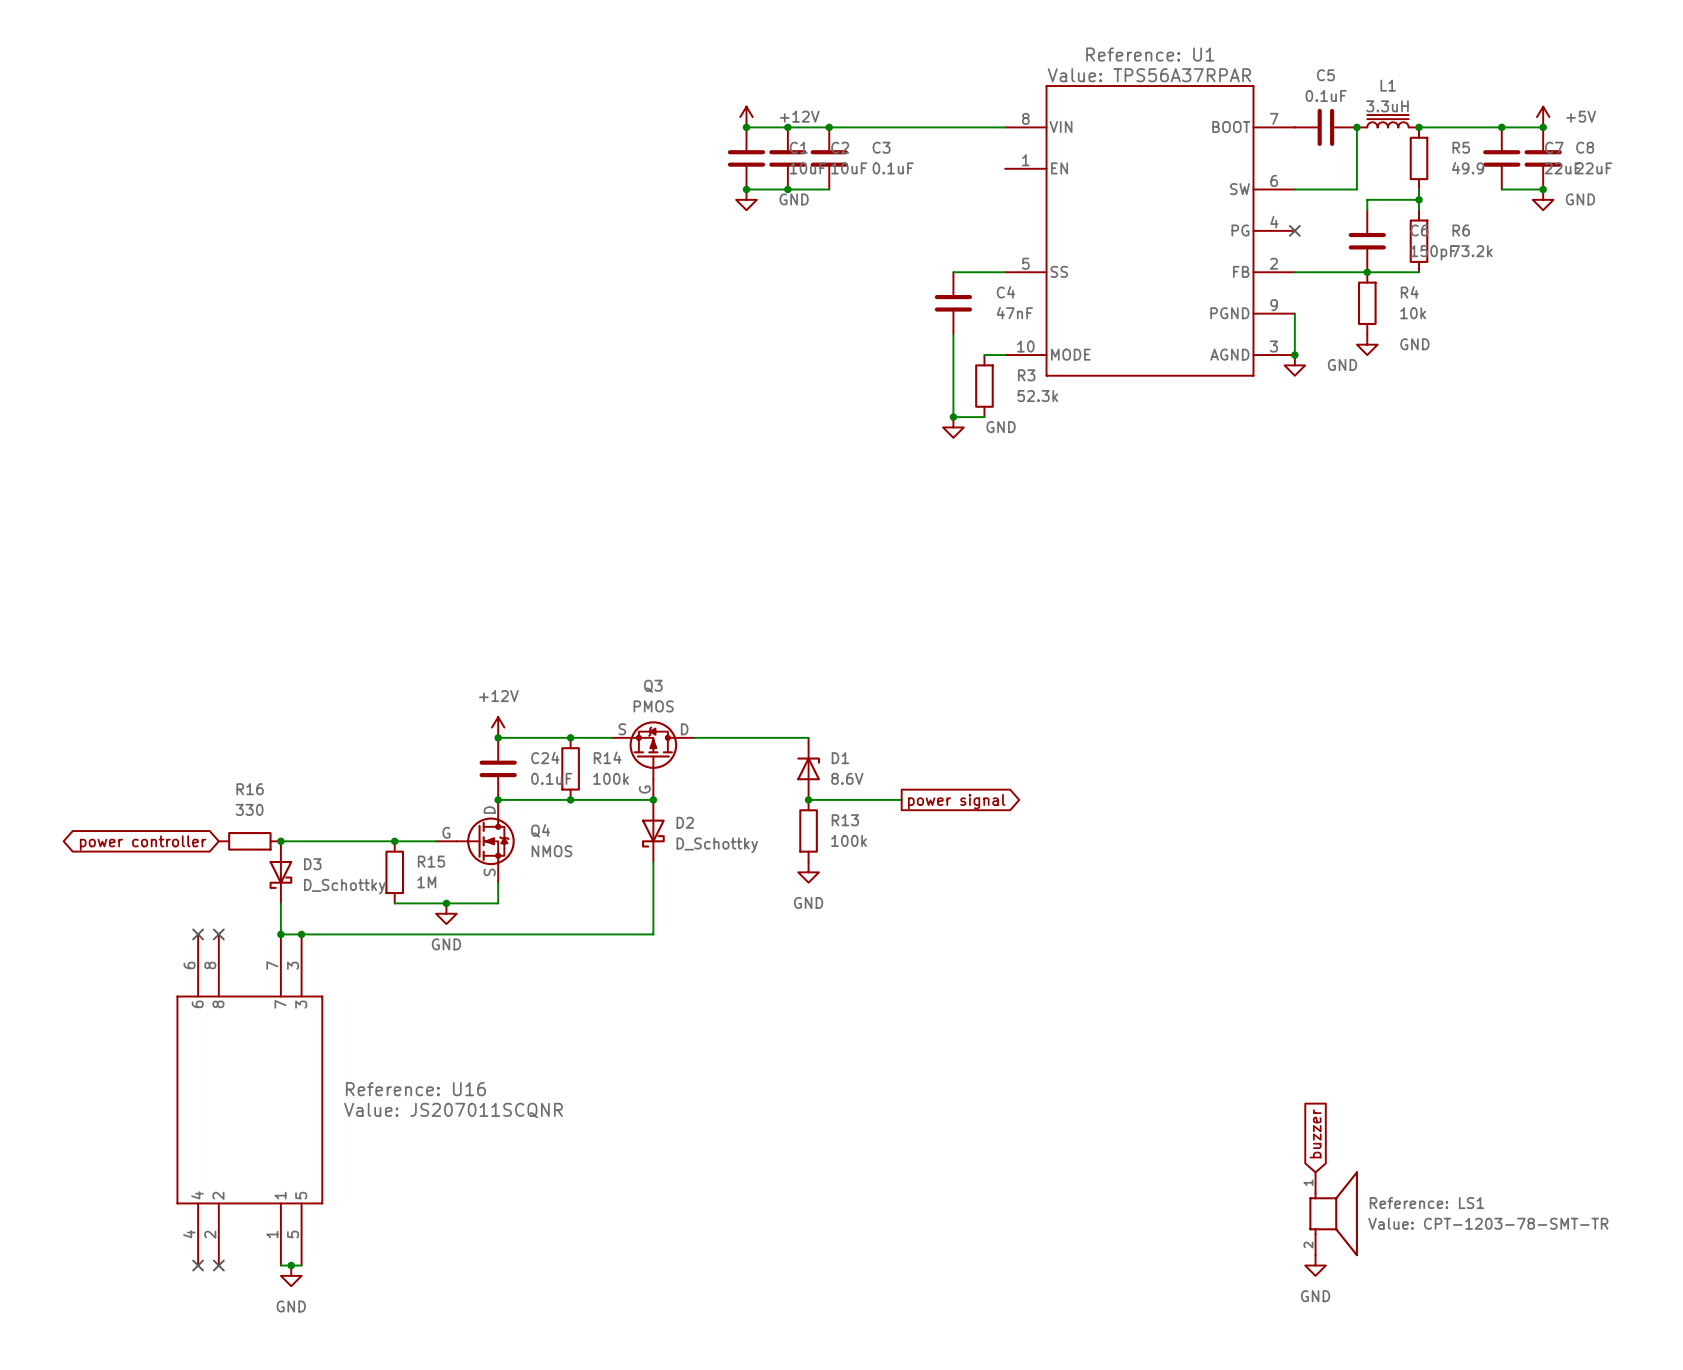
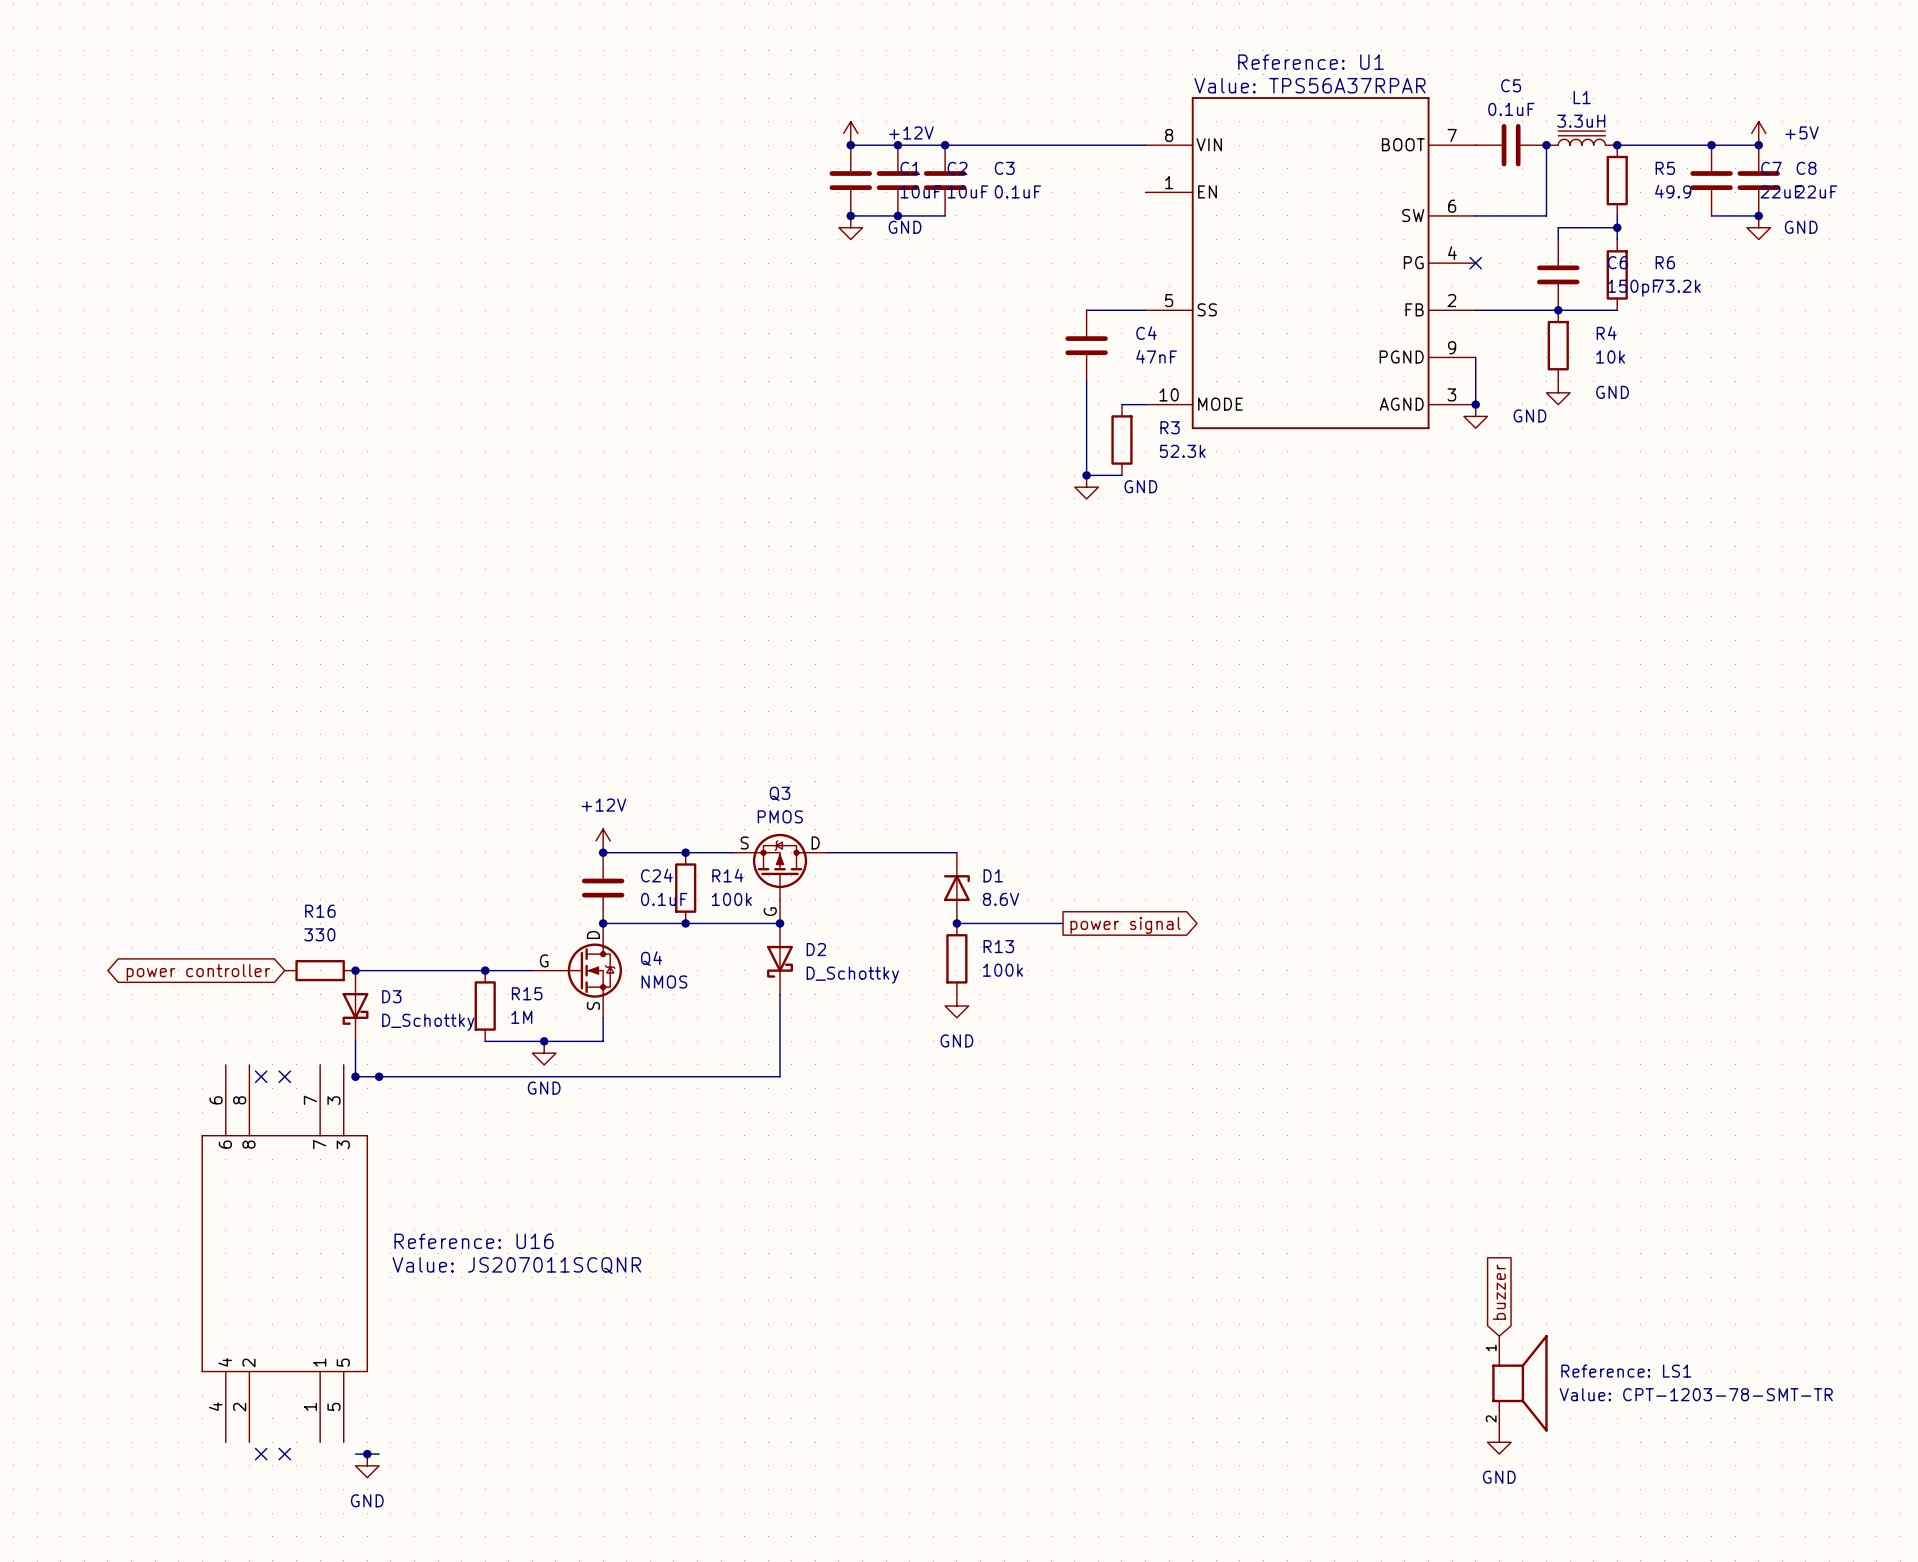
power symbol position: +12V (498, 727) -> +12V (603, 840)
wire: (498, 737) (611, 737) -> (603, 852) (732, 852)
junction: (498, 737) -> none
junction: (570, 737) -> none
wire: (694, 737) (808, 737) -> (827, 852) (956, 852)
junction: none -> (603, 852)
junction: none -> (685, 852)
Q3 position: (653, 760) -> (780, 878)
C24 position: (498, 768) -> (603, 888)
R14 position: (570, 768) -> (685, 888)
D1 position: (808, 768) -> (956, 888)
wire: (498, 799) (653, 799) -> (603, 923) (780, 923)
junction: (498, 799) -> none
junction: (570, 799) -> none
junction: (653, 799) -> none
wire: (808, 799) (901, 799) -> (956, 923) (1063, 923)
junction position: (808, 799) -> (956, 923)
global label position: power signal (956, 801) -> power signal (1125, 925)
junction: none -> (603, 923)
junction: none -> (685, 923)
junction: none -> (780, 923)
D2 position: (653, 830) -> (780, 958)
R13 position: (808, 830) -> (956, 958)
R16 position: (249, 841) -> (320, 970)
wire: (280, 841) (436, 841) -> (355, 970) (532, 970)
junction position: (280, 841) -> (355, 970)
junction: (394, 841) -> none
Q4 position: (475, 841) -> (577, 970)
global label position: power controller (143, 843) -> power controller (198, 972)
junction: none -> (485, 970)
wire: (653, 862) (653, 934) (280, 934) (280, 903) -> (780, 994) (780, 1076) (355, 1076) (355, 1041)
D3 position: (280, 872) -> (355, 1006)
R15 position: (394, 872) -> (485, 1006)
power symbol position: GND (808, 872) -> GND (956, 1006)
wire: (498, 882) (498, 903) (394, 903) -> (603, 1017) (603, 1041) (485, 1041)
junction: (446, 903) -> none
power symbol position: GND (446, 913) -> GND (544, 1053)
junction: none -> (544, 1041)
no-connect mark: (198, 934) -> none
no-connect mark position: (218, 934) -> (261, 1076)
junction: (280, 934) -> none
junction position: (301, 934) -> (355, 1076)
no-connect mark: none -> (284, 1076)
junction: none -> (379, 1076)
no-connect mark: (198, 1265) -> none
no-connect mark position: (218, 1265) -> (261, 1454)
wire: (280, 1265) (301, 1265) -> (355, 1454) (379, 1454)
junction position: (291, 1265) -> (367, 1454)
no-connect mark: none -> (284, 1454)
power symbol position: GND (291, 1275) -> GND (367, 1465)

